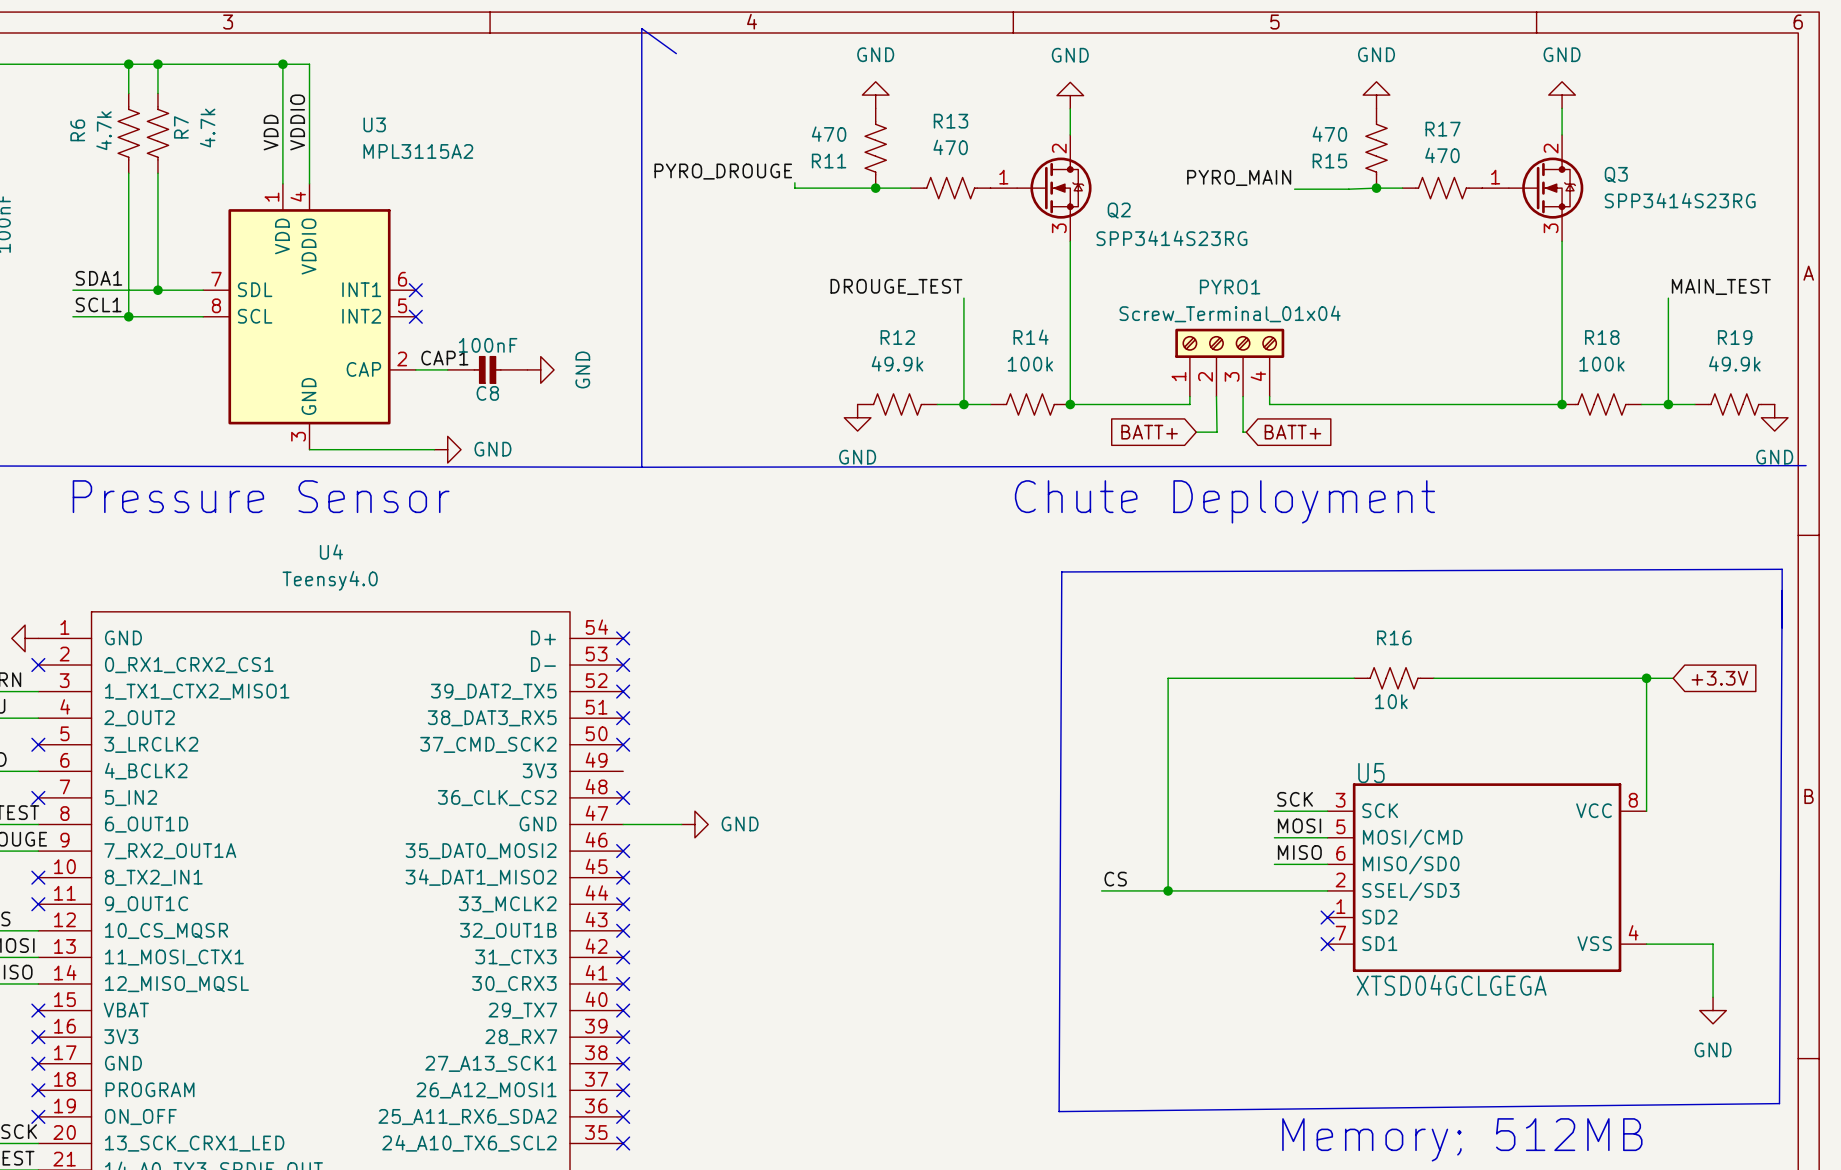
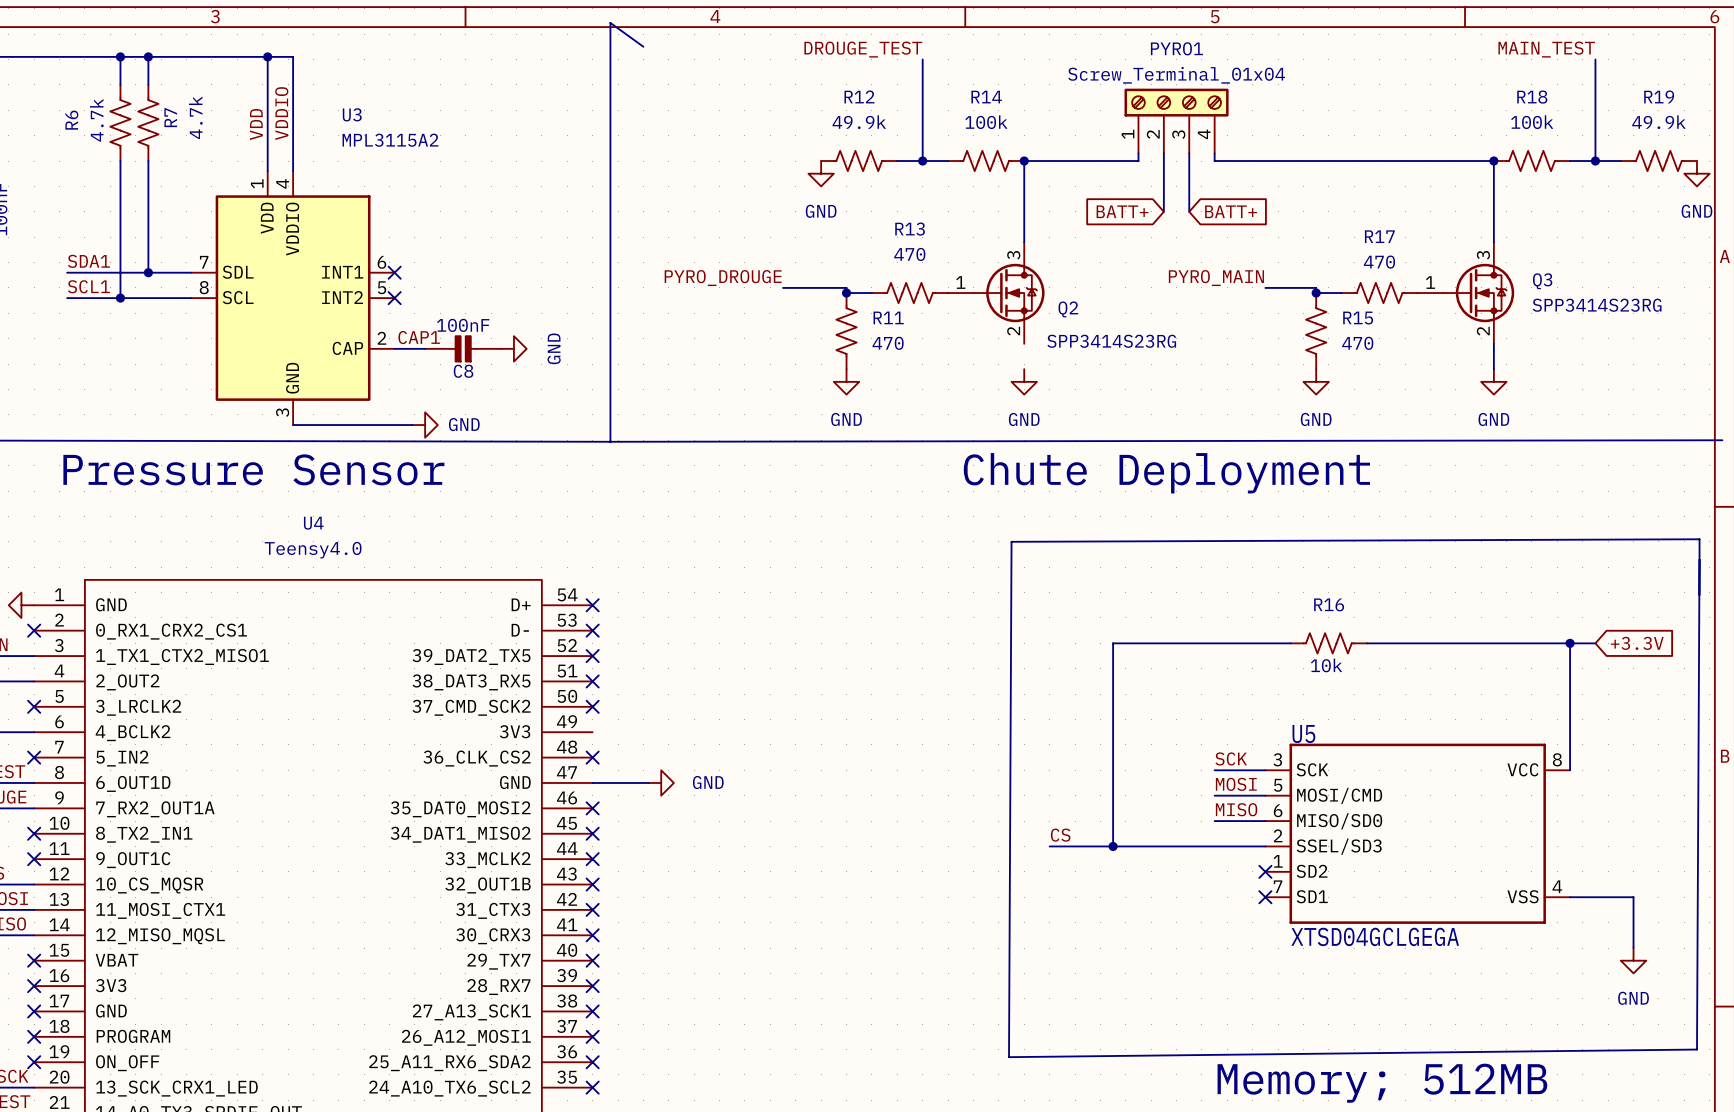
power symbol rotation: 0° (875, 95) -> 180° (821, 173)
power symbol position: GND (875, 95) -> GND (821, 173)
power symbol: GND (1070, 95) -> none
power symbol: GND (1376, 95) -> none
power symbol: GND (1562, 95) -> none
wire: (1070, 108) (1070, 134) -> none
wire: (1562, 108) (1562, 134) -> (1493, 343) (1493, 369)
R11 value position: 470 (829, 134) -> 470 (888, 343)
R15 value position: 470 (1329, 134) -> 470 (1357, 343)
R11 position: (875, 148) -> (846, 331)
Q2 pin number: 2 (1059, 148) -> 3 (1013, 255)
R15 position: (1376, 148) -> (1316, 331)
Q3 pin number: 2 (1551, 148) -> 3 (1483, 255)
R11 name position: R11 (829, 161) -> R11 (888, 317)
R15 name position: R15 (1329, 161) -> R15 (1358, 318)
wire: none -> (1138, 153) (1138, 161) (1024, 161) (1024, 242)
wire: none -> (1163, 153) (1163, 211)
wire: none -> (1189, 153) (1189, 211)
wire: none -> (1214, 153) (1214, 161) (1493, 161) (1493, 242)
label position: PYRO_DROUGE (723, 171) -> PYRO_DROUGE (723, 278)
junction: none -> (922, 161)
junction: none -> (1024, 161)
junction: none -> (1493, 161)
junction: none -> (1595, 161)
label position: PYRO_MAIN (1239, 177) -> PYRO_MAIN (1216, 278)
wire: (794, 182) (794, 188) (910, 188) -> none
power symbol: none -> GND (1696, 173)
junction: (875, 188) -> none
R13 position: (950, 188) -> (909, 293)
Q2 position: (1041, 188) -> (996, 293)
junction: (1376, 188) -> none
wire: (1402, 188) (1294, 189) -> none
R17 position: (1442, 188) -> (1379, 293)
Q3 position: (1532, 188) -> (1465, 293)
Q2 name position: Q2 (1119, 210) -> Q2 (1068, 309)
global label: none -> BATT+ (1122, 211)
global label: none -> BATT+ (1231, 211)
Q2 pin number: 3 (1059, 228) -> 2 (1013, 331)
Q3 pin number: 3 (1551, 228) -> 2 (1483, 331)
wire: (1070, 241) (1070, 404) (1189, 404) (1189, 396) -> none
wire: (1562, 241) (1562, 404) (1269, 404) (1269, 396) -> none
label position: DROUGE_TEST (896, 286) -> DROUGE_TEST (863, 49)
label position: MAIN_TEST (1721, 286) -> MAIN_TEST (1546, 49)
wire: (963, 298) (963, 404) -> (922, 59) (922, 161)
wire: (1668, 298) (1668, 404) -> (1595, 59) (1595, 161)
wire: none -> (783, 287) (846, 287) (846, 293) (871, 293)
wire: none -> (1265, 287) (1316, 287) (1316, 293) (1341, 293)
junction: none -> (846, 293)
junction: none -> (1316, 293)
PYRO1 position: (1229, 362) -> (1176, 121)
wire: (1216, 396) (1217, 432) (1196, 432) -> none
wire: (1243, 396) (1243, 432) (1246, 432) -> none
R12 position: (897, 404) -> (859, 161)
wire: (937, 404) (990, 404) -> (897, 161) (948, 161)
junction: (963, 404) -> none
R14 position: (1030, 404) -> (986, 161)
junction: (1070, 404) -> none
power symbol: none -> GND (1024, 381)
power symbol: none -> GND (1316, 381)
junction: (1562, 404) -> none
power symbol: none -> GND (1493, 381)
R18 position: (1601, 404) -> (1531, 161)
wire: (1641, 404) (1694, 404) -> (1570, 161) (1620, 161)
junction: (1668, 404) -> none
R19 position: (1734, 404) -> (1658, 161)
power symbol position: GND (857, 417) -> GND (846, 381)
power symbol: GND (1774, 417) -> none
global label: BATT+ (1149, 432) -> none
global label: BATT+ (1292, 432) -> none

